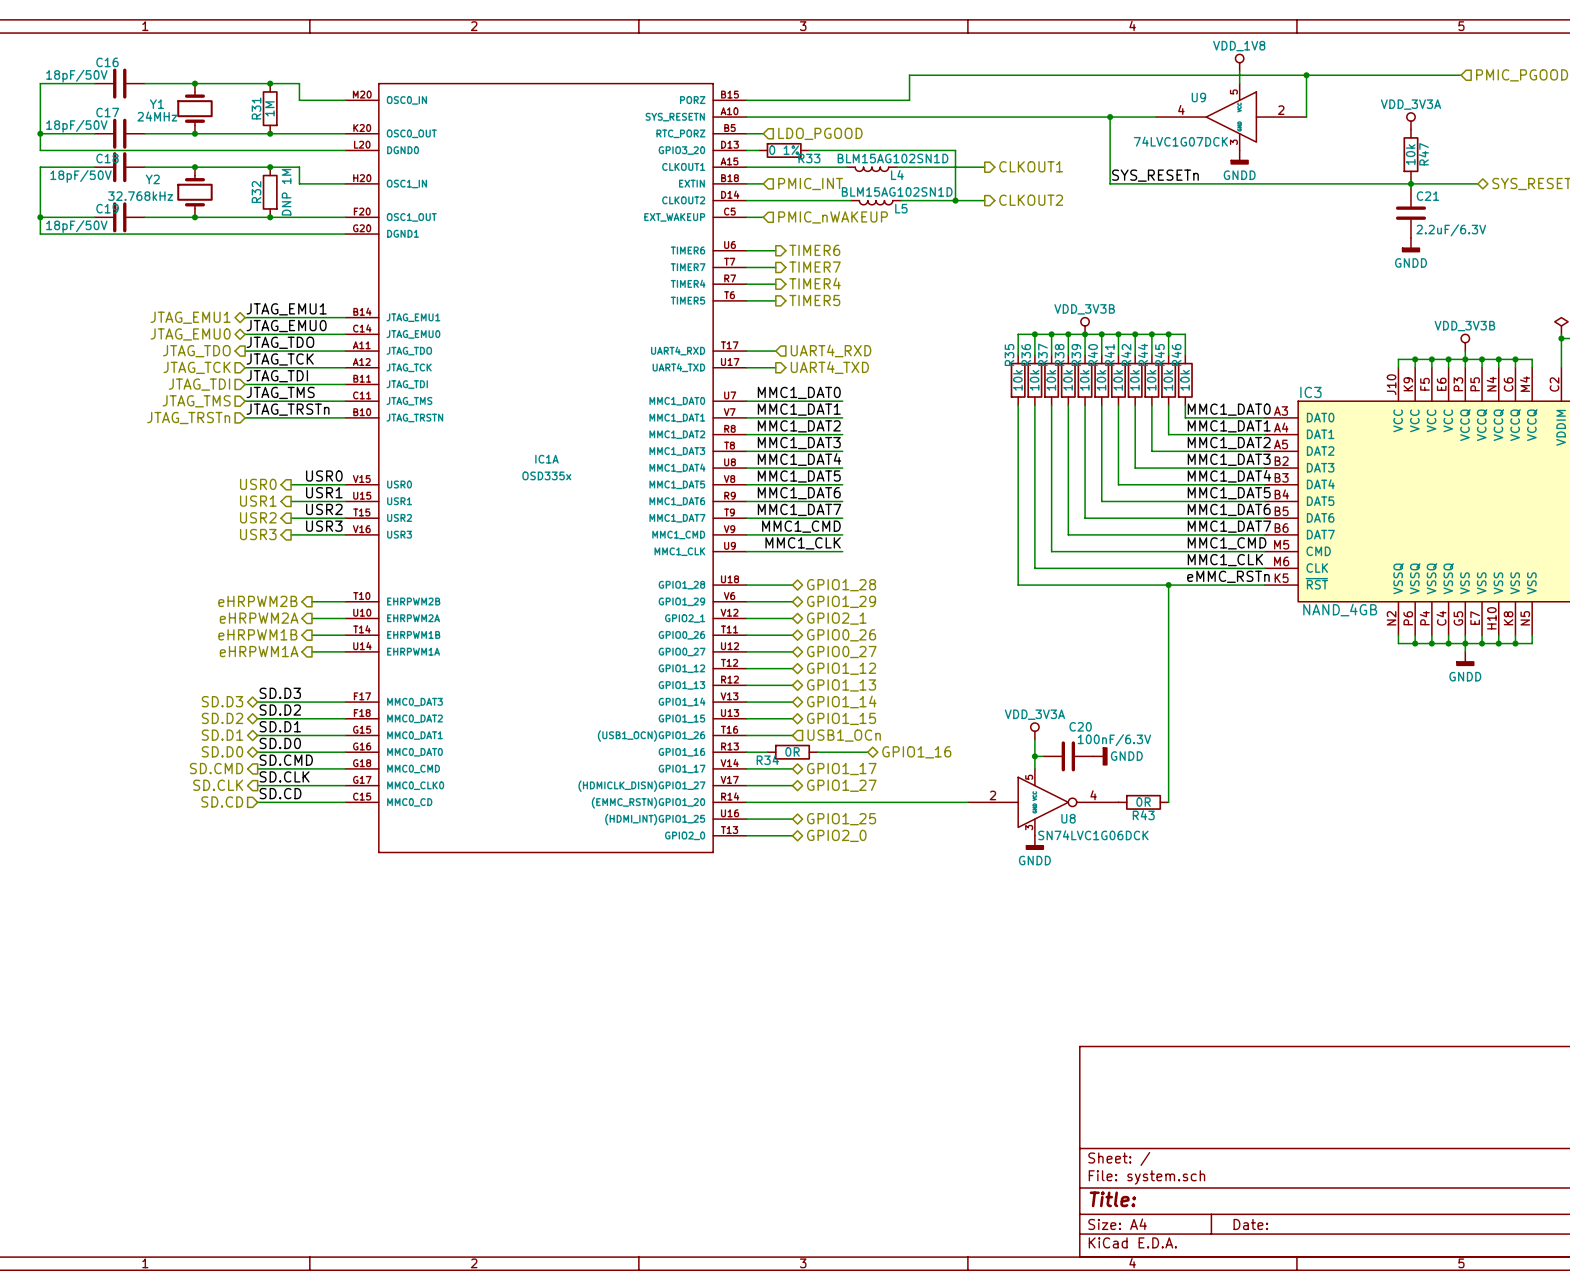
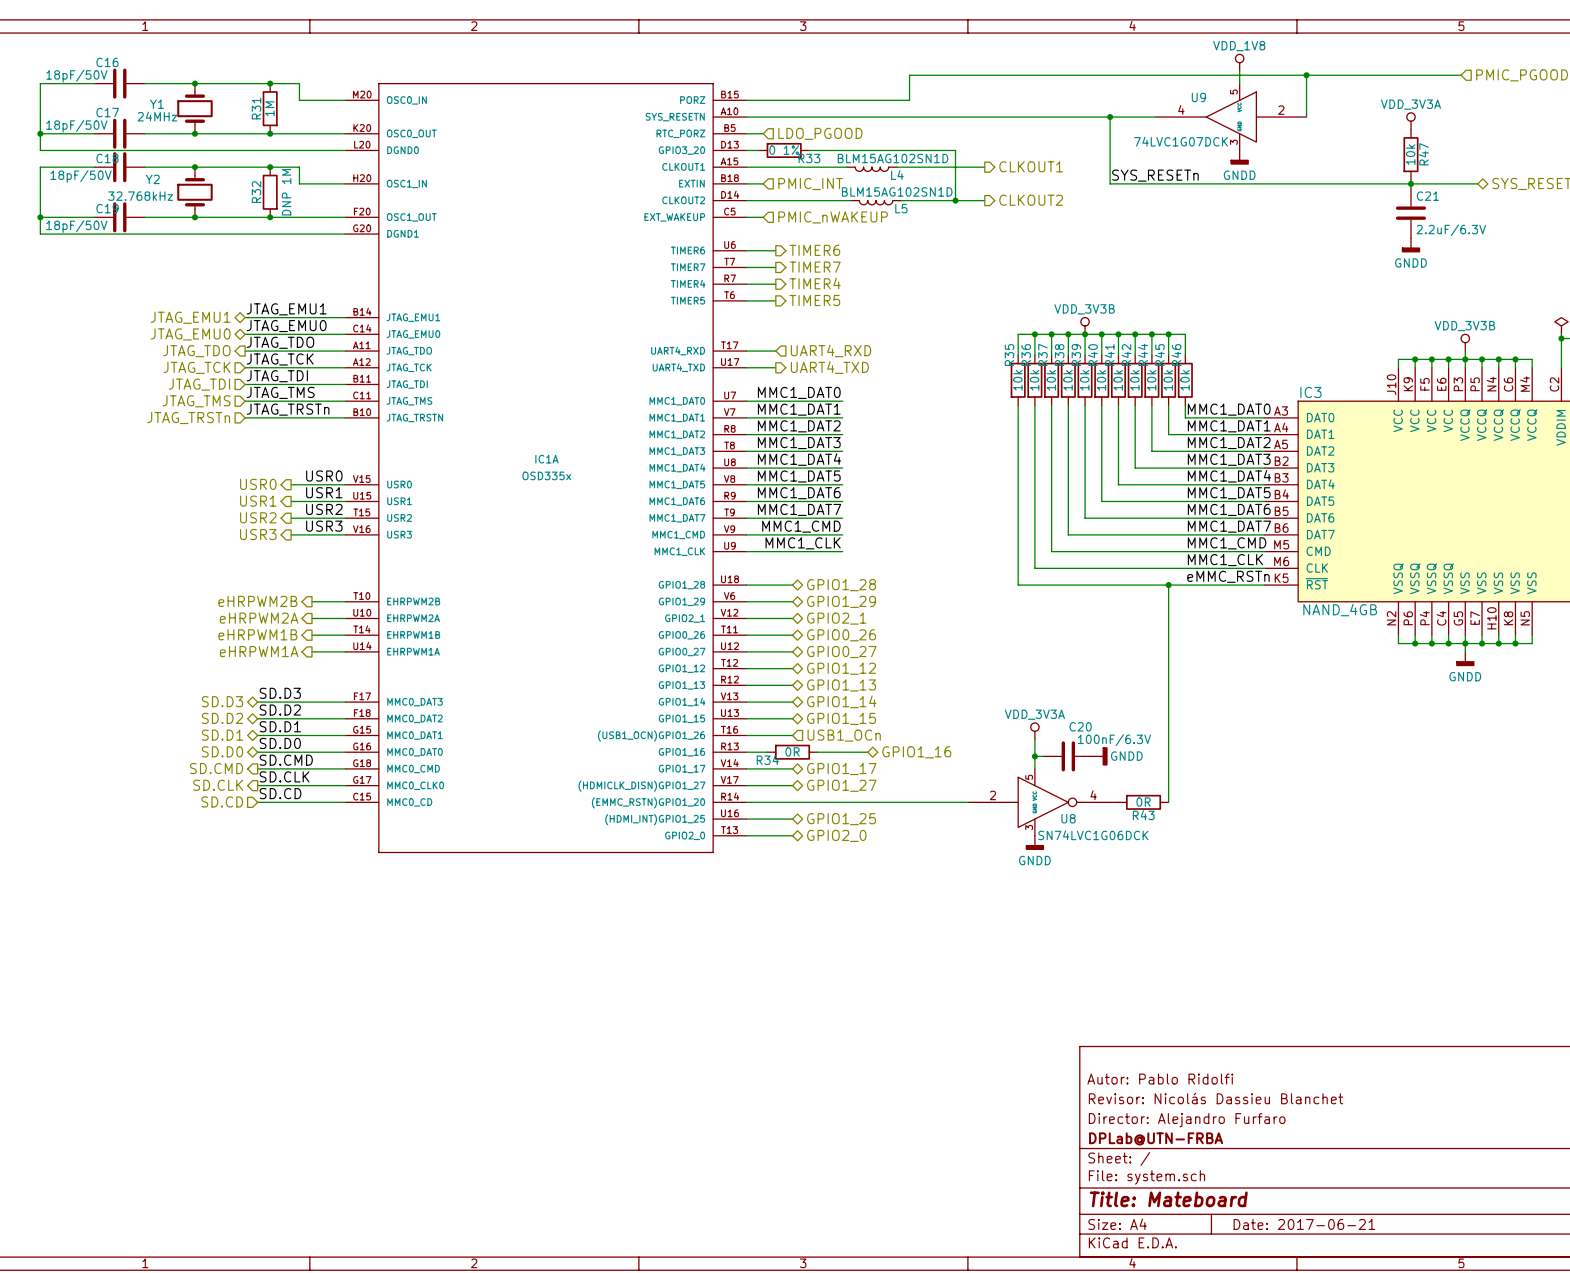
title block: none -> Autor: Pablo Ridolfi (1160, 1079)
title block: none -> Revisor: Nicolás Dassieu Blanchet (1216, 1098)
title block: none -> Director: Alejandro Furfaro (1187, 1120)
title block: none -> DPLab@UTN-FRBA (1156, 1138)
title block: Title: (1112, 1199) -> Title: Mateboard (1168, 1199)
title block: Date: (1250, 1224) -> Date: 2017-06-21 (1304, 1224)

